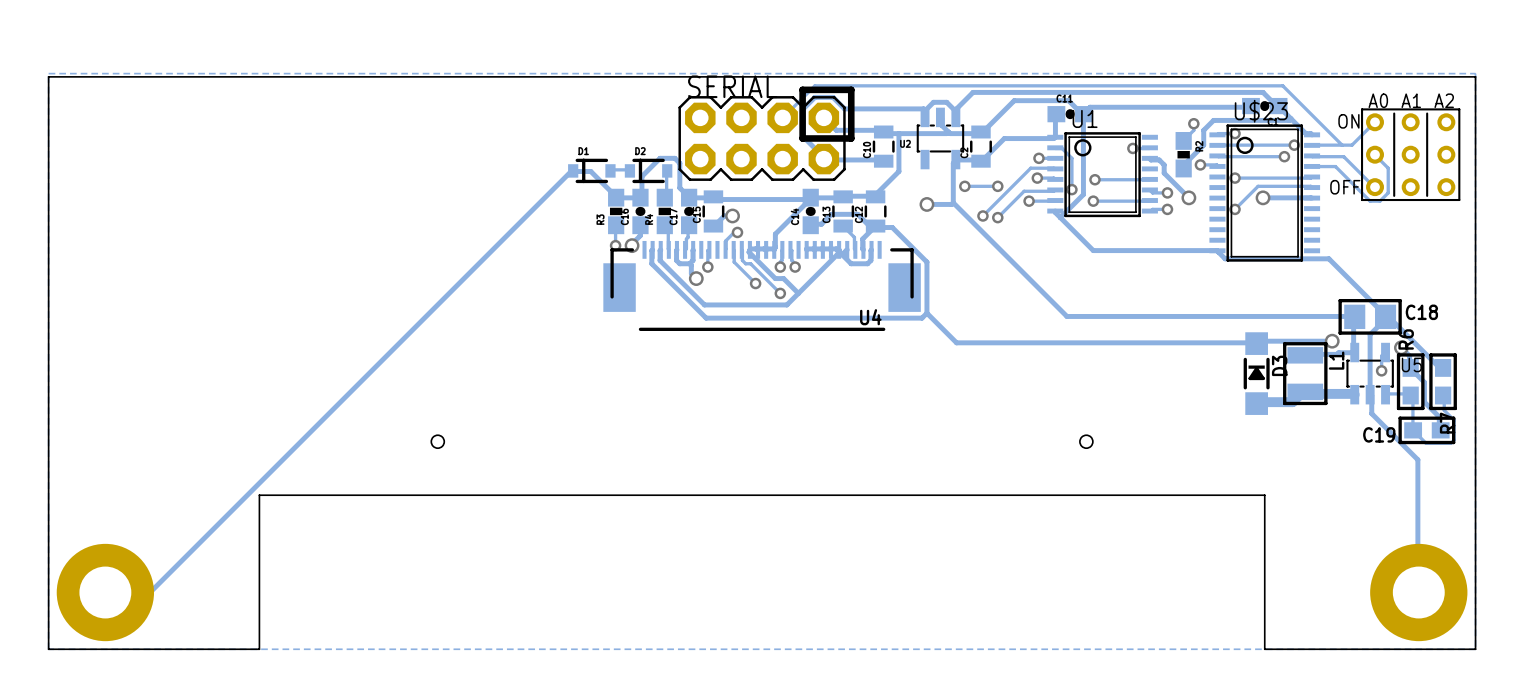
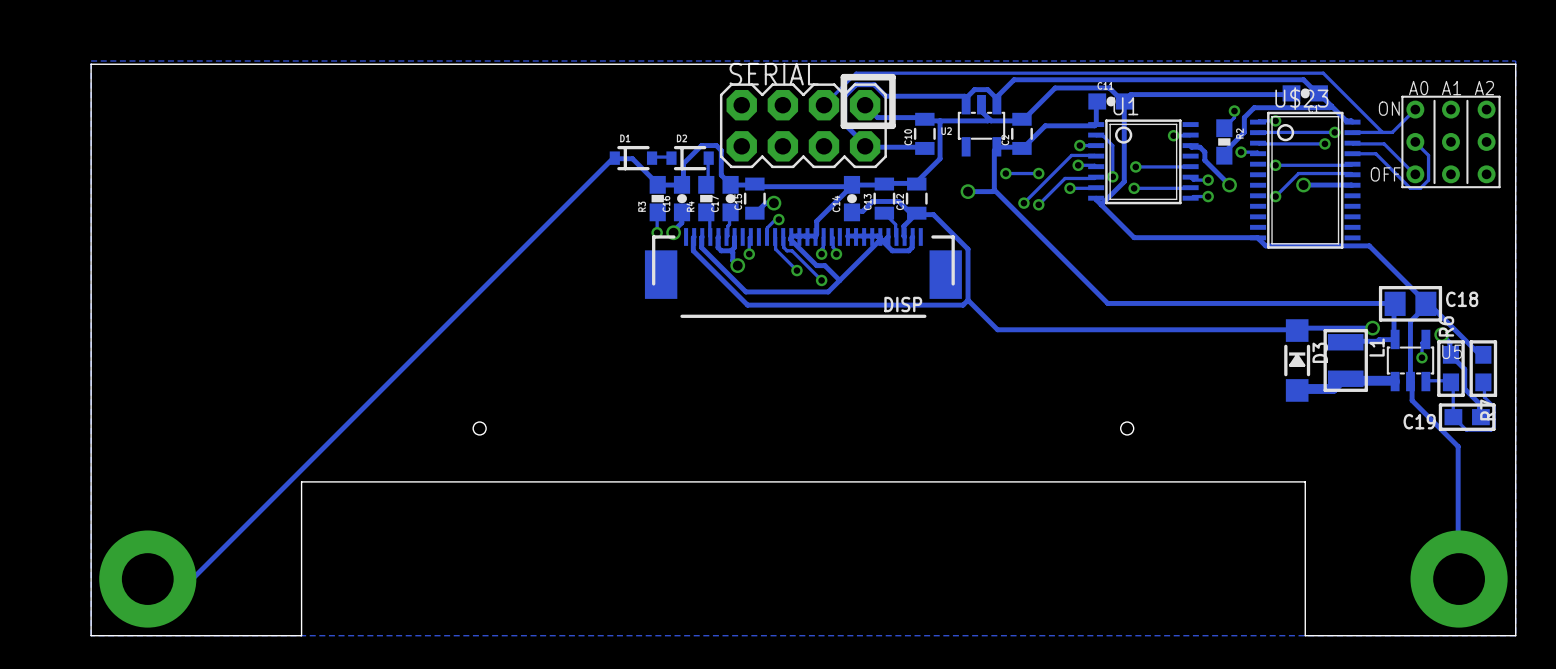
U4 name: U4 (870, 317) -> DISP (903, 304)

